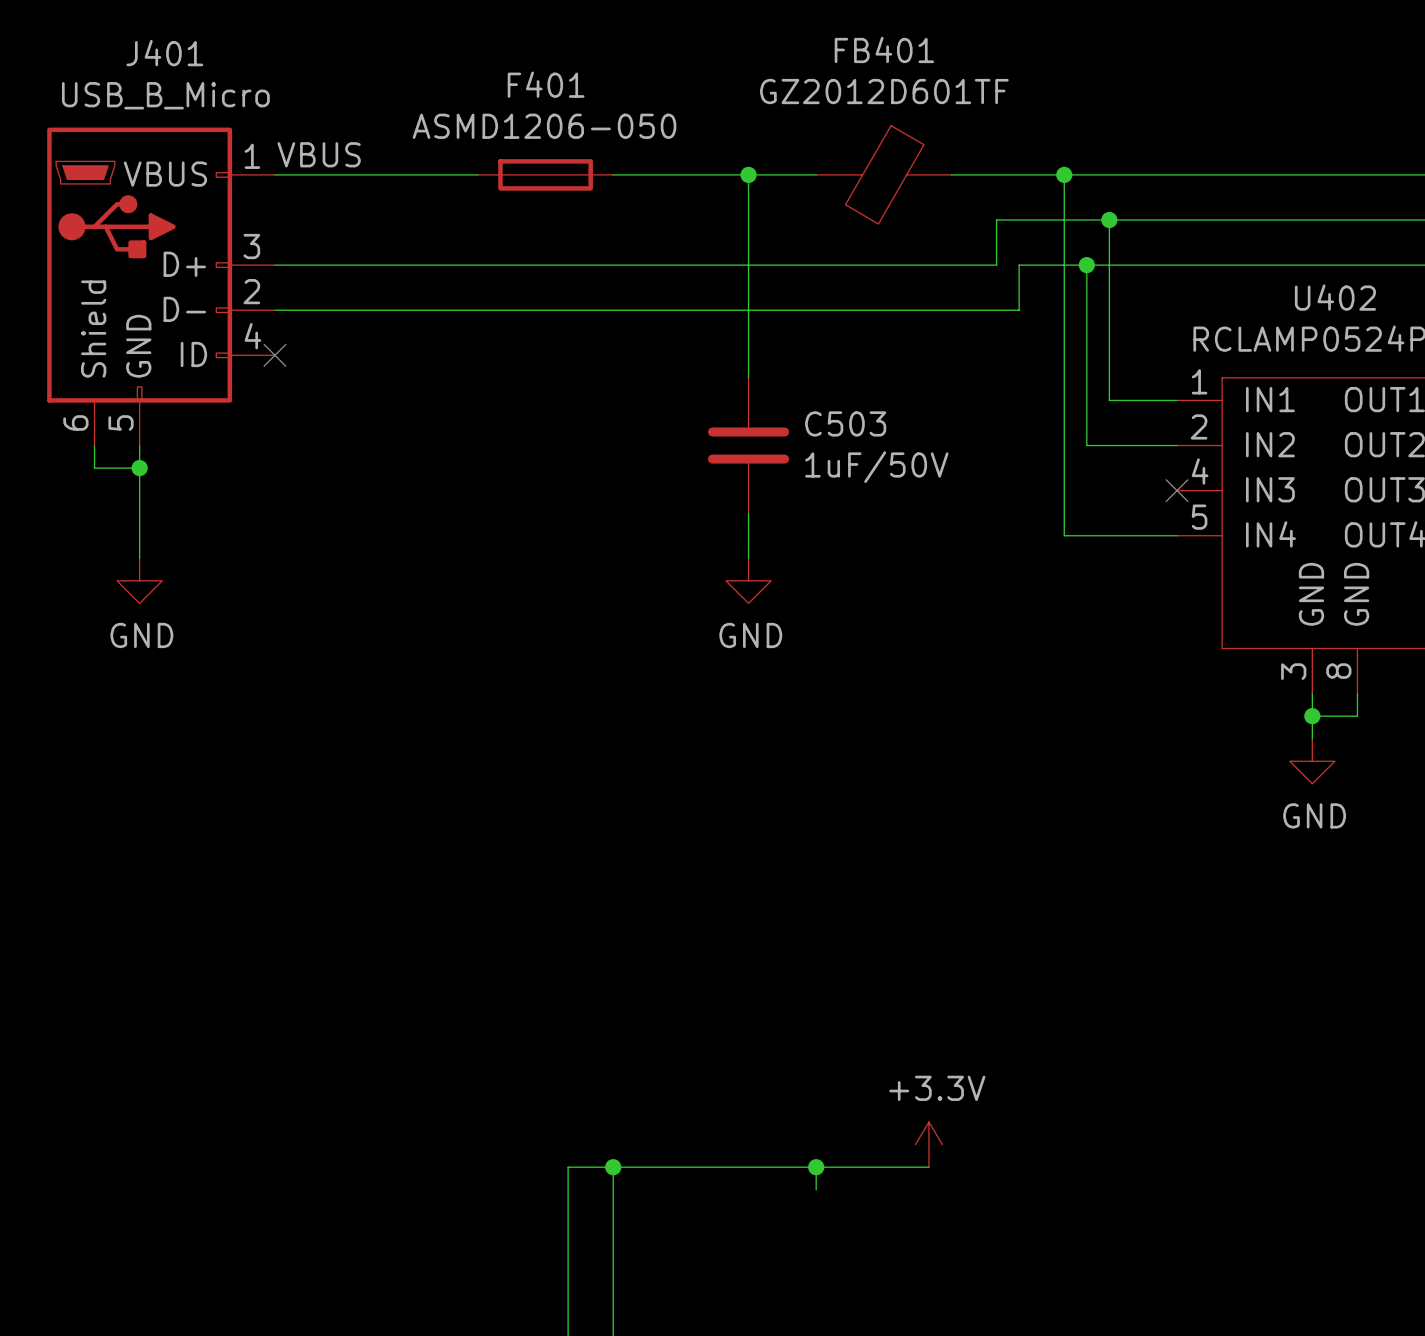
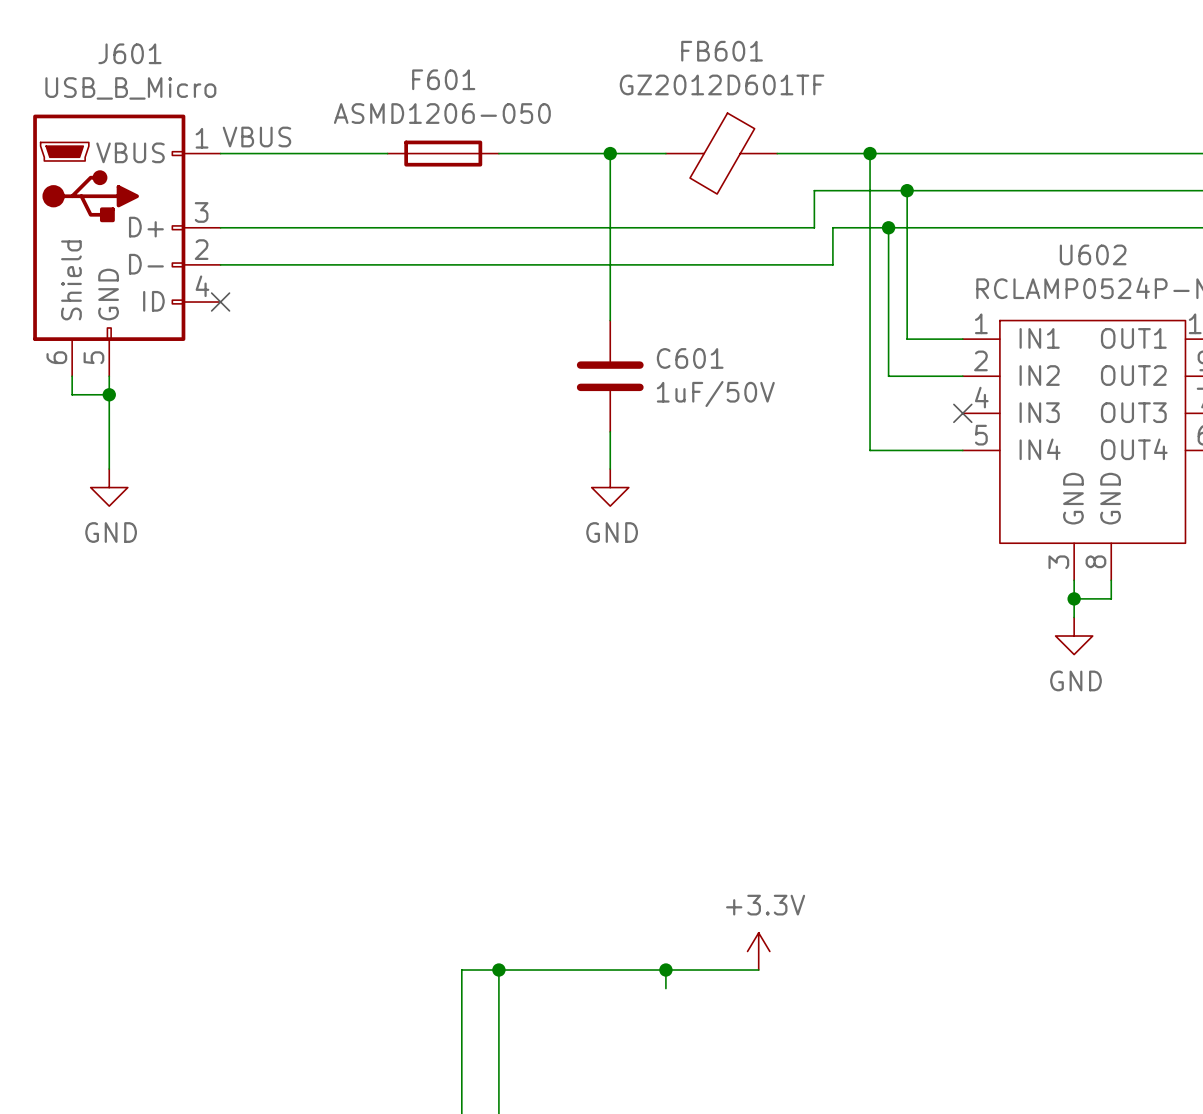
FB401 name: FB401 (884, 49) -> FB601 (722, 51)
J401 name: J401 (164, 53) -> J601 (129, 53)
F401 name: F401 (546, 84) -> F601 (443, 79)
U402 name: U402 (1335, 297) -> U602 (1093, 254)
C503 name: C503 (845, 423) -> C601 (690, 358)

